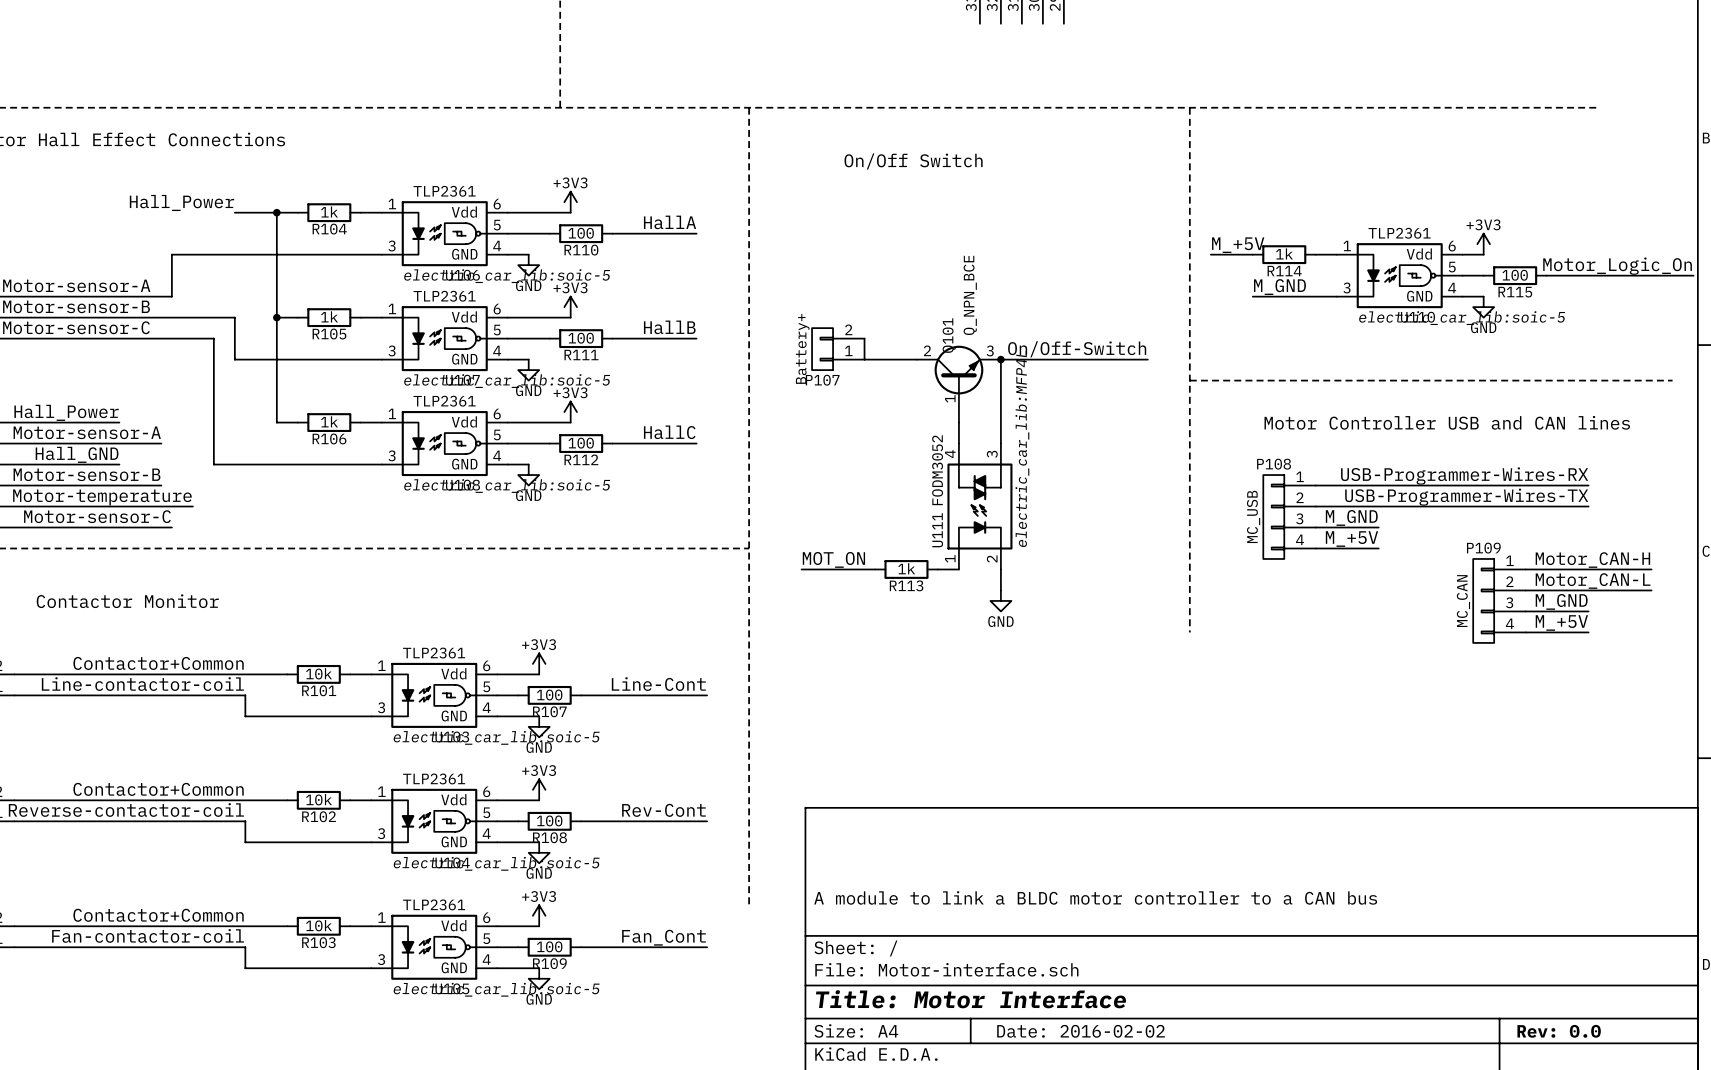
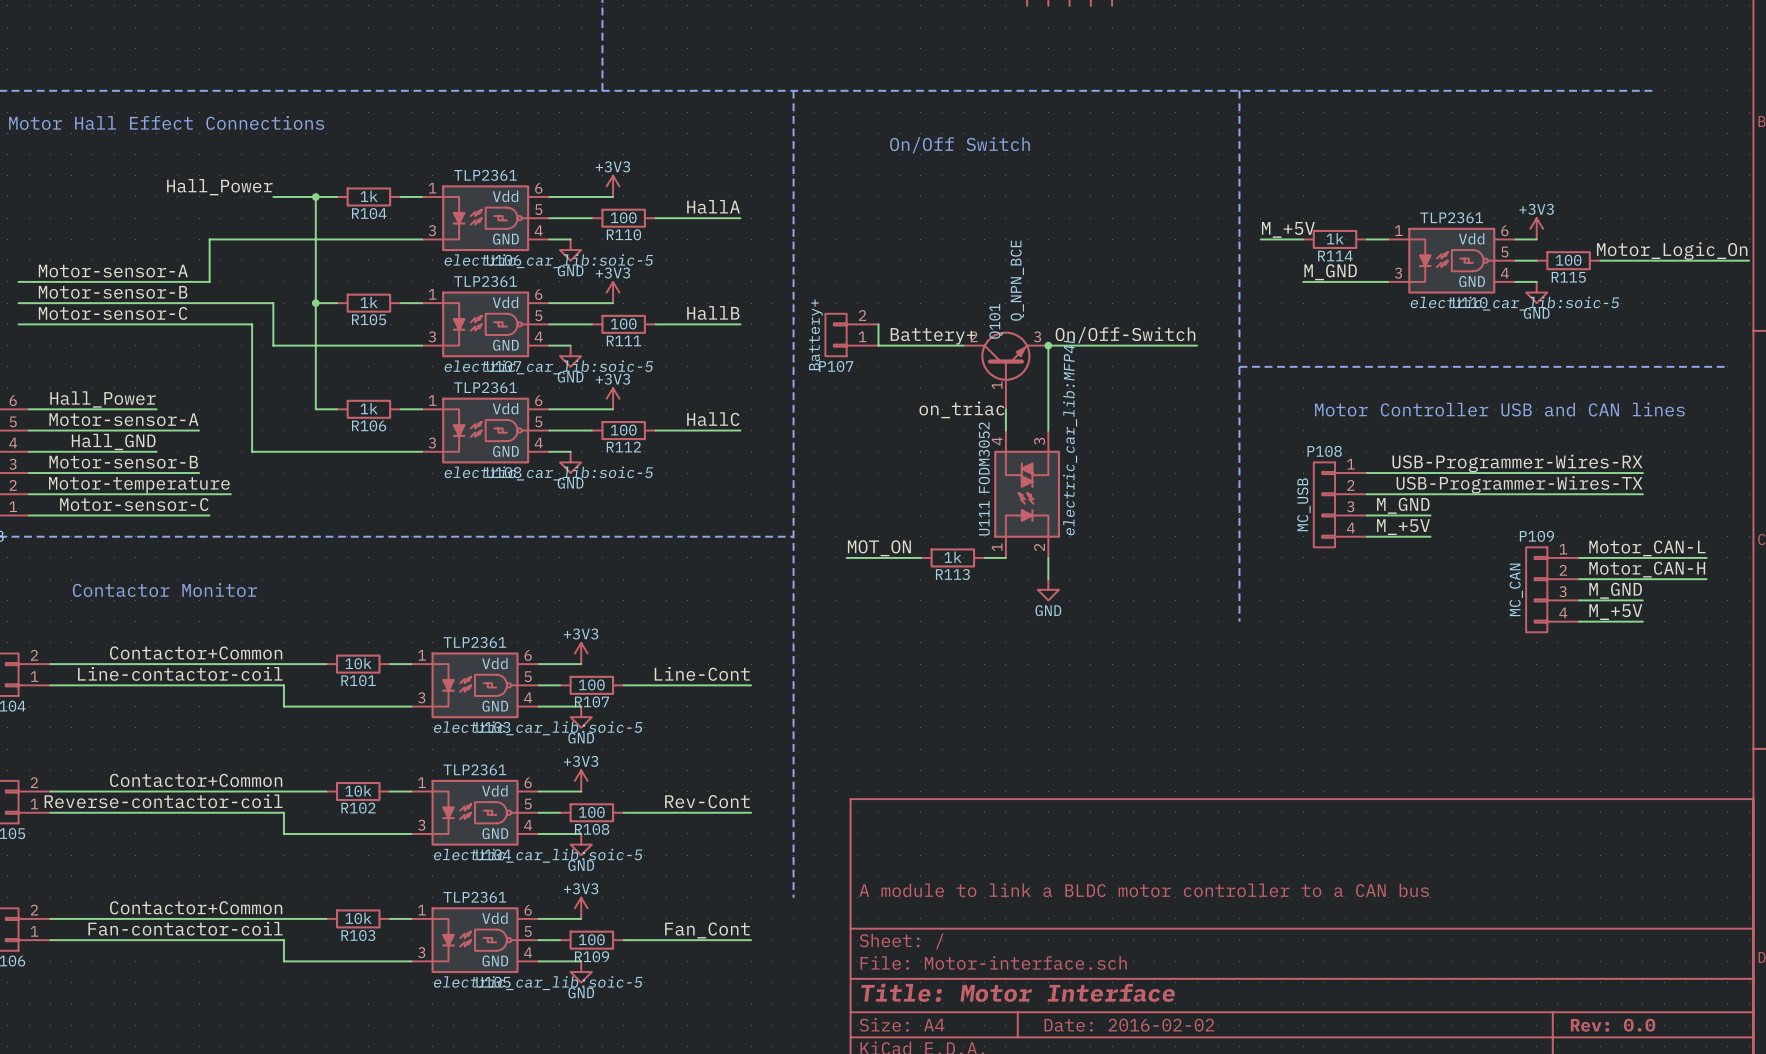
P107 position: (838, 349) -> (851, 335)
label: none -> Battery+ (933, 336)
label: none -> on_triac (961, 409)
label: Motor_CAN-H (1592, 560) -> Motor_CAN-L (1647, 548)
label: Motor_CAN-L (1593, 581) -> Motor_CAN-H (1647, 569)

